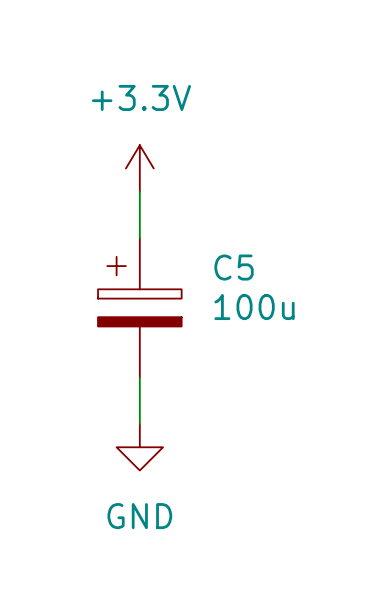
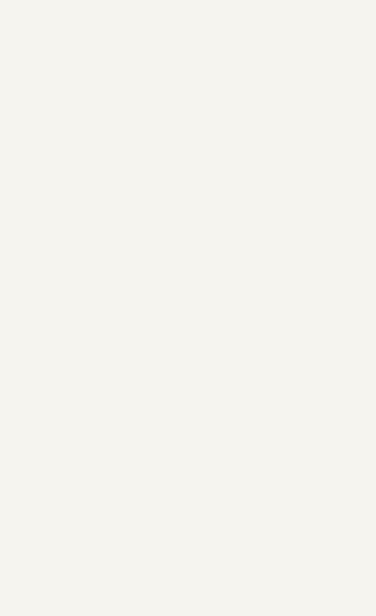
power symbol: +3.3V (139, 168) -> none
wire: (139, 191) (139, 238) -> none
C5: 100u (139, 307) -> none
wire: (139, 377) (139, 424) -> none
power symbol: GND (139, 447) -> none

